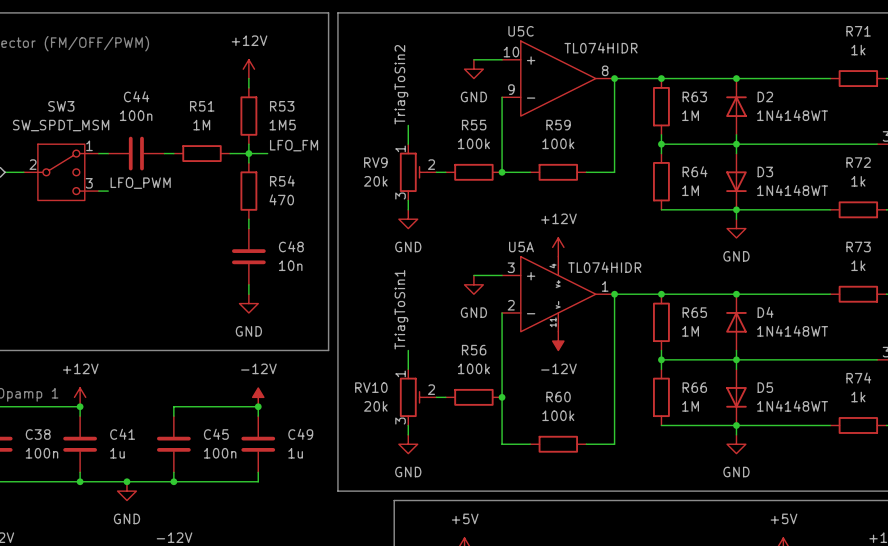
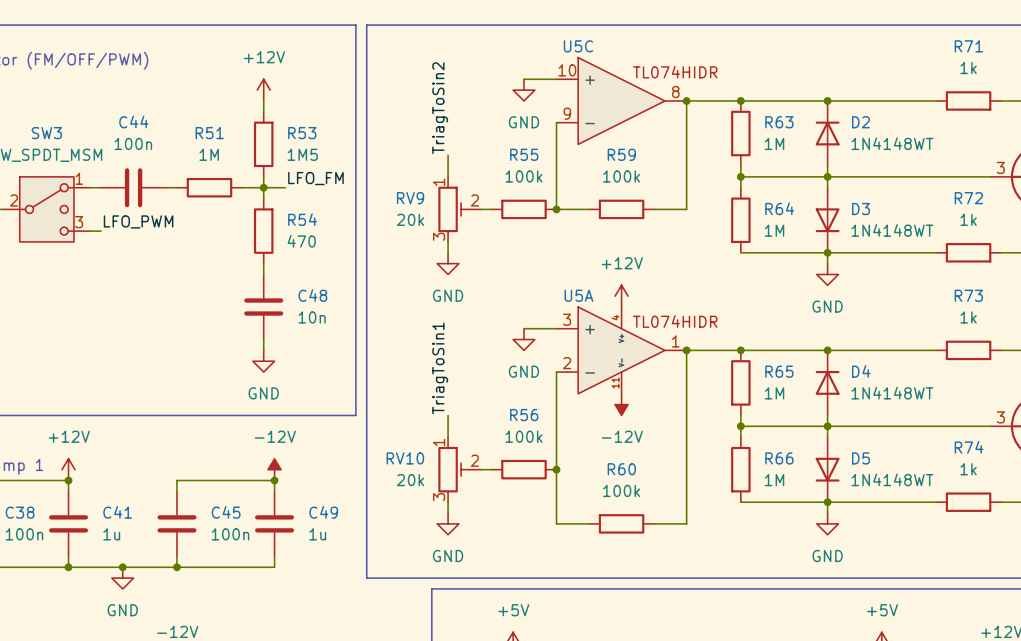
U5C value: TL074HIDR (600, 47) -> none
U5C text: none -> TL074HIDR (675, 72)
U5A value: TL074HIDR (604, 267) -> none
U5A text: none -> TL074HIDR (675, 321)

